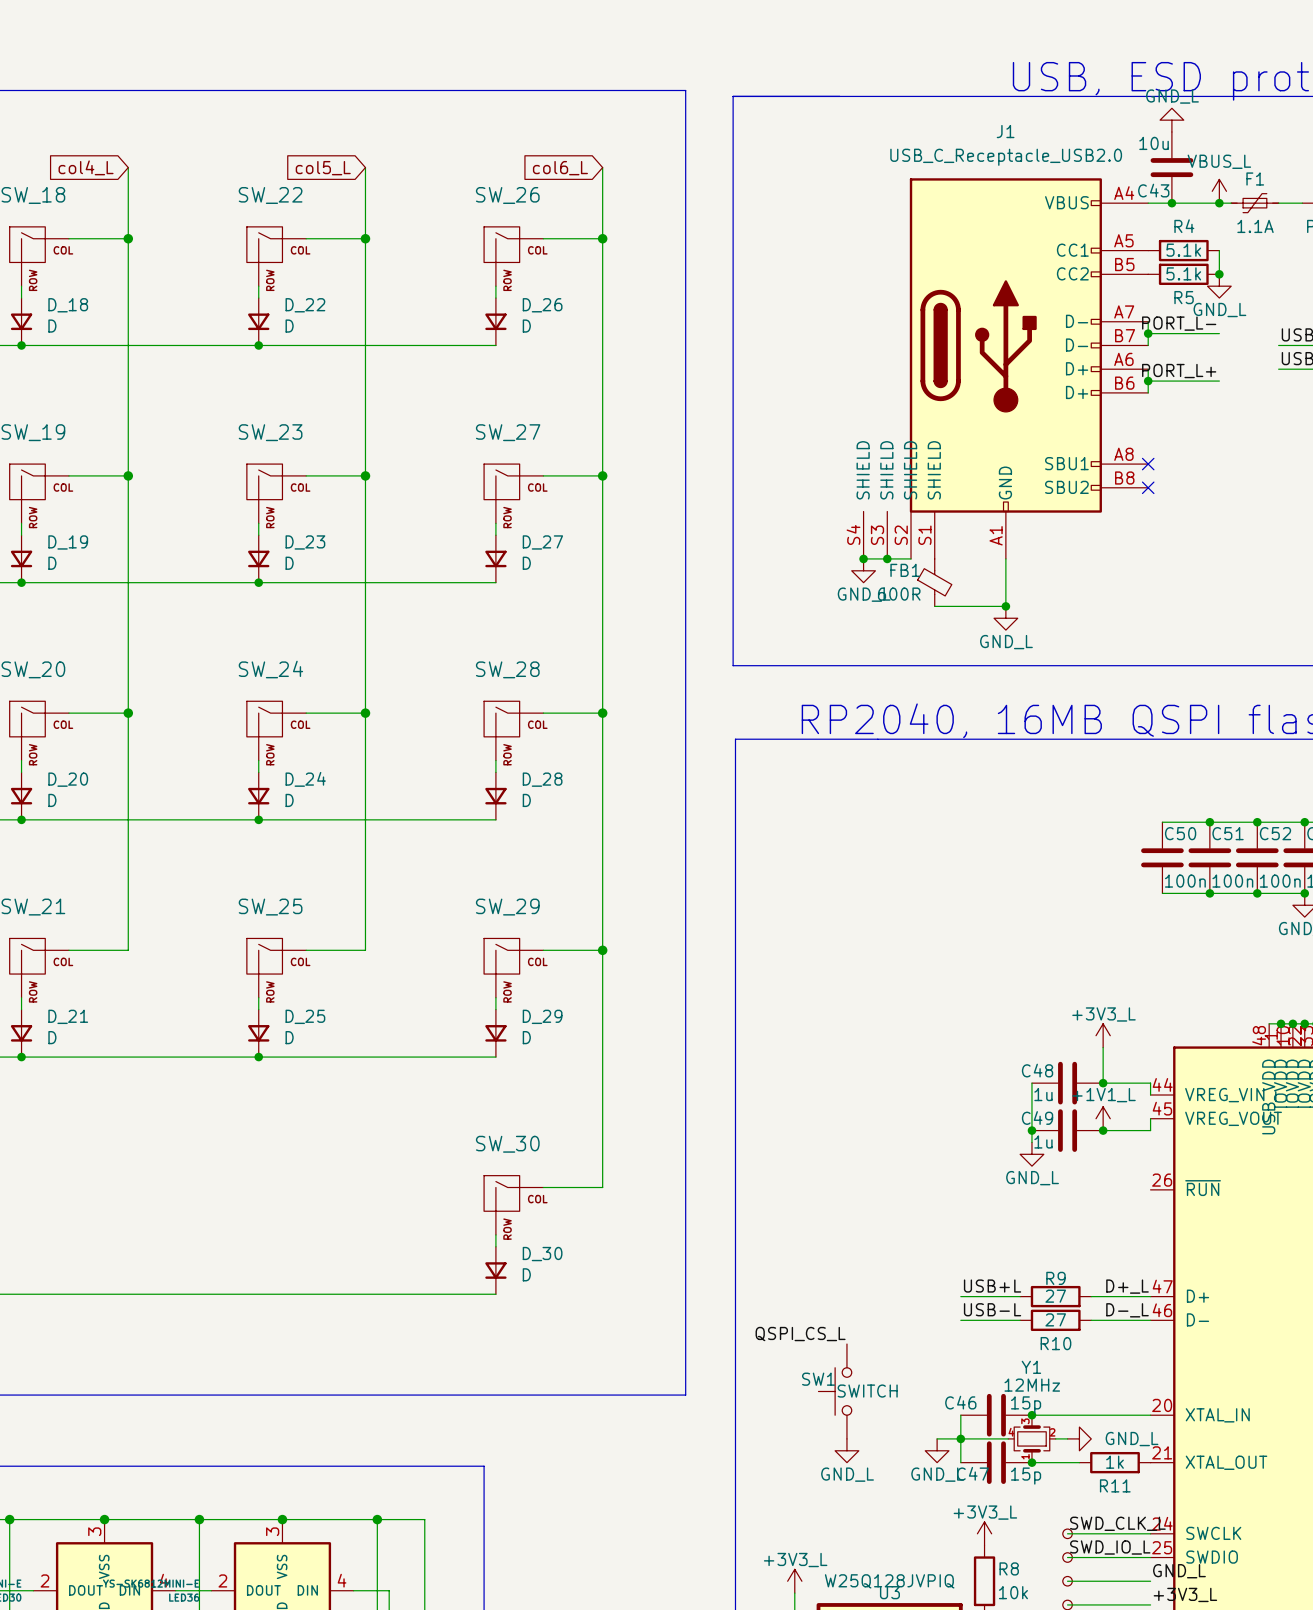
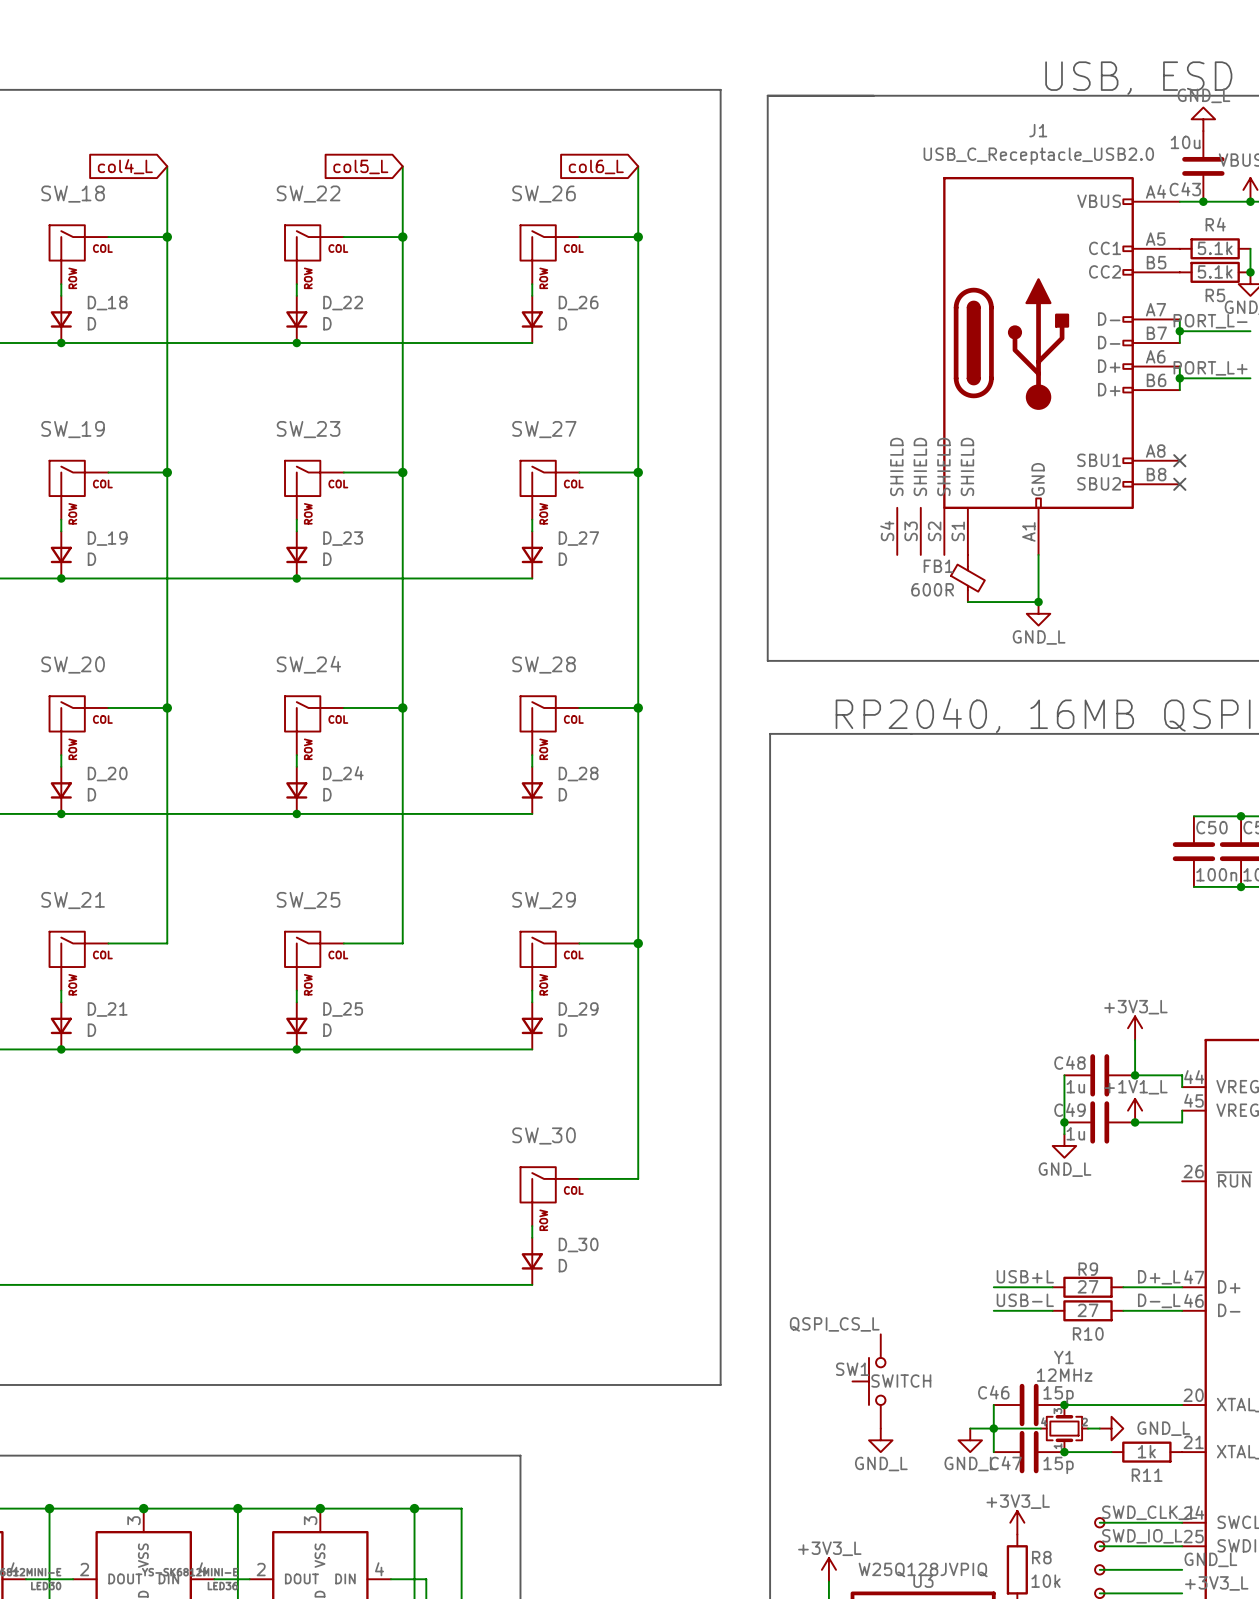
wire: (863, 558) (911, 558) -> none
junction: (863, 558) -> none
junction: (887, 558) -> none
power symbol: GND_L (863, 570) -> none

